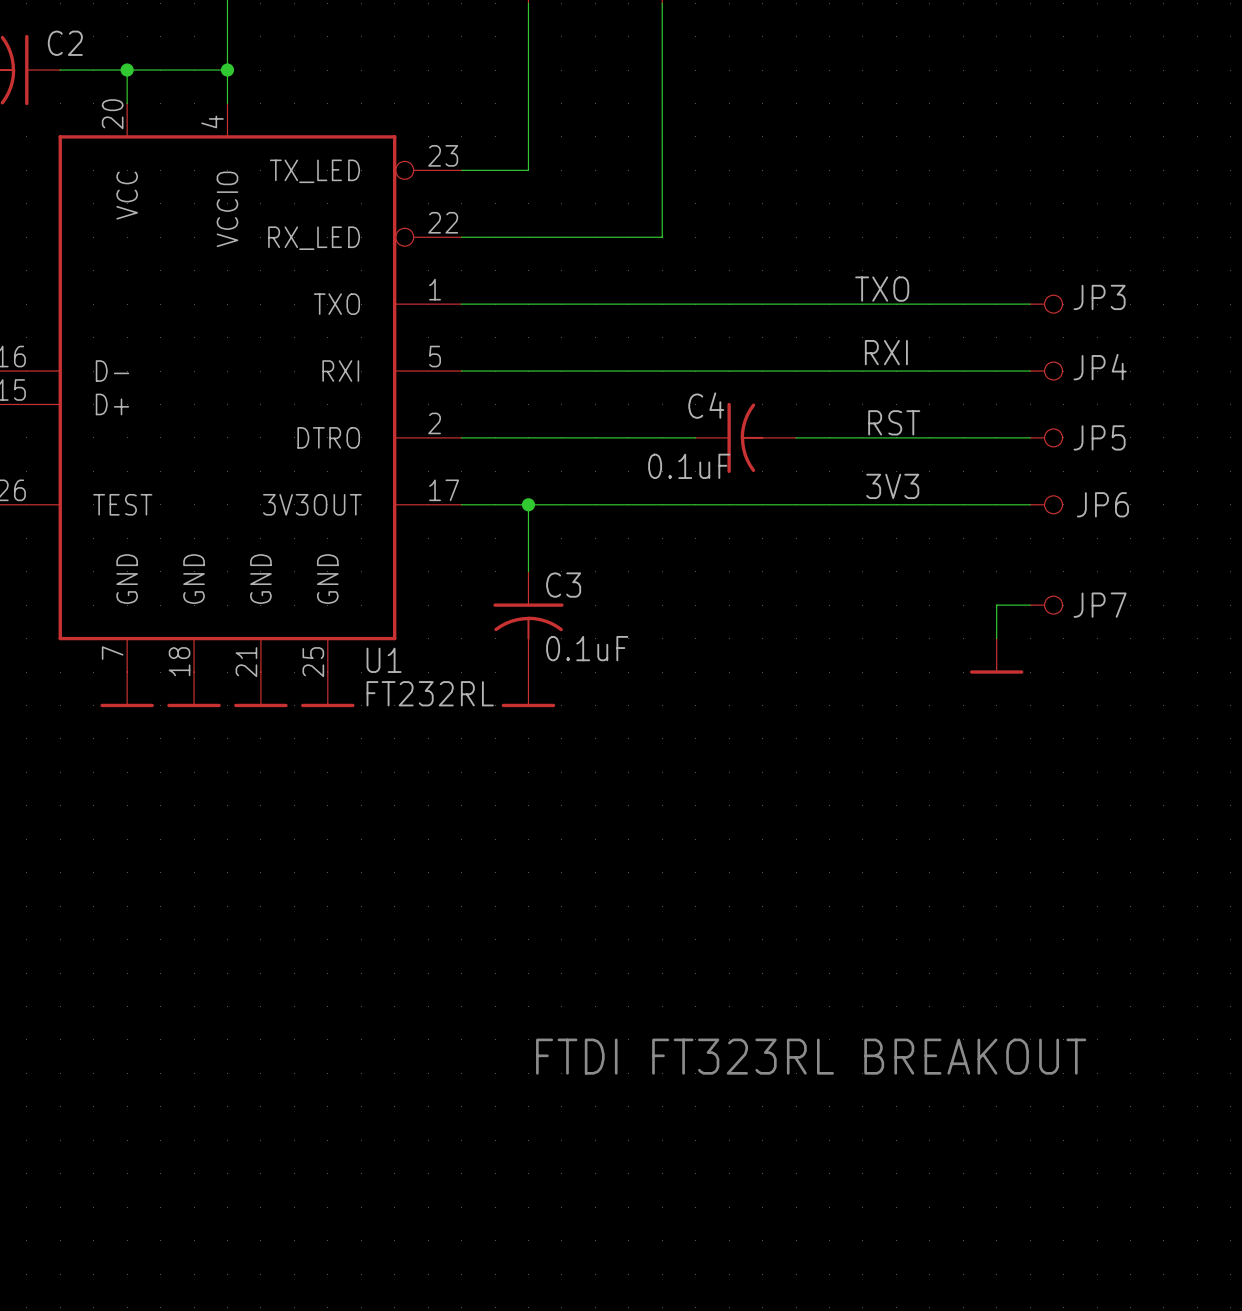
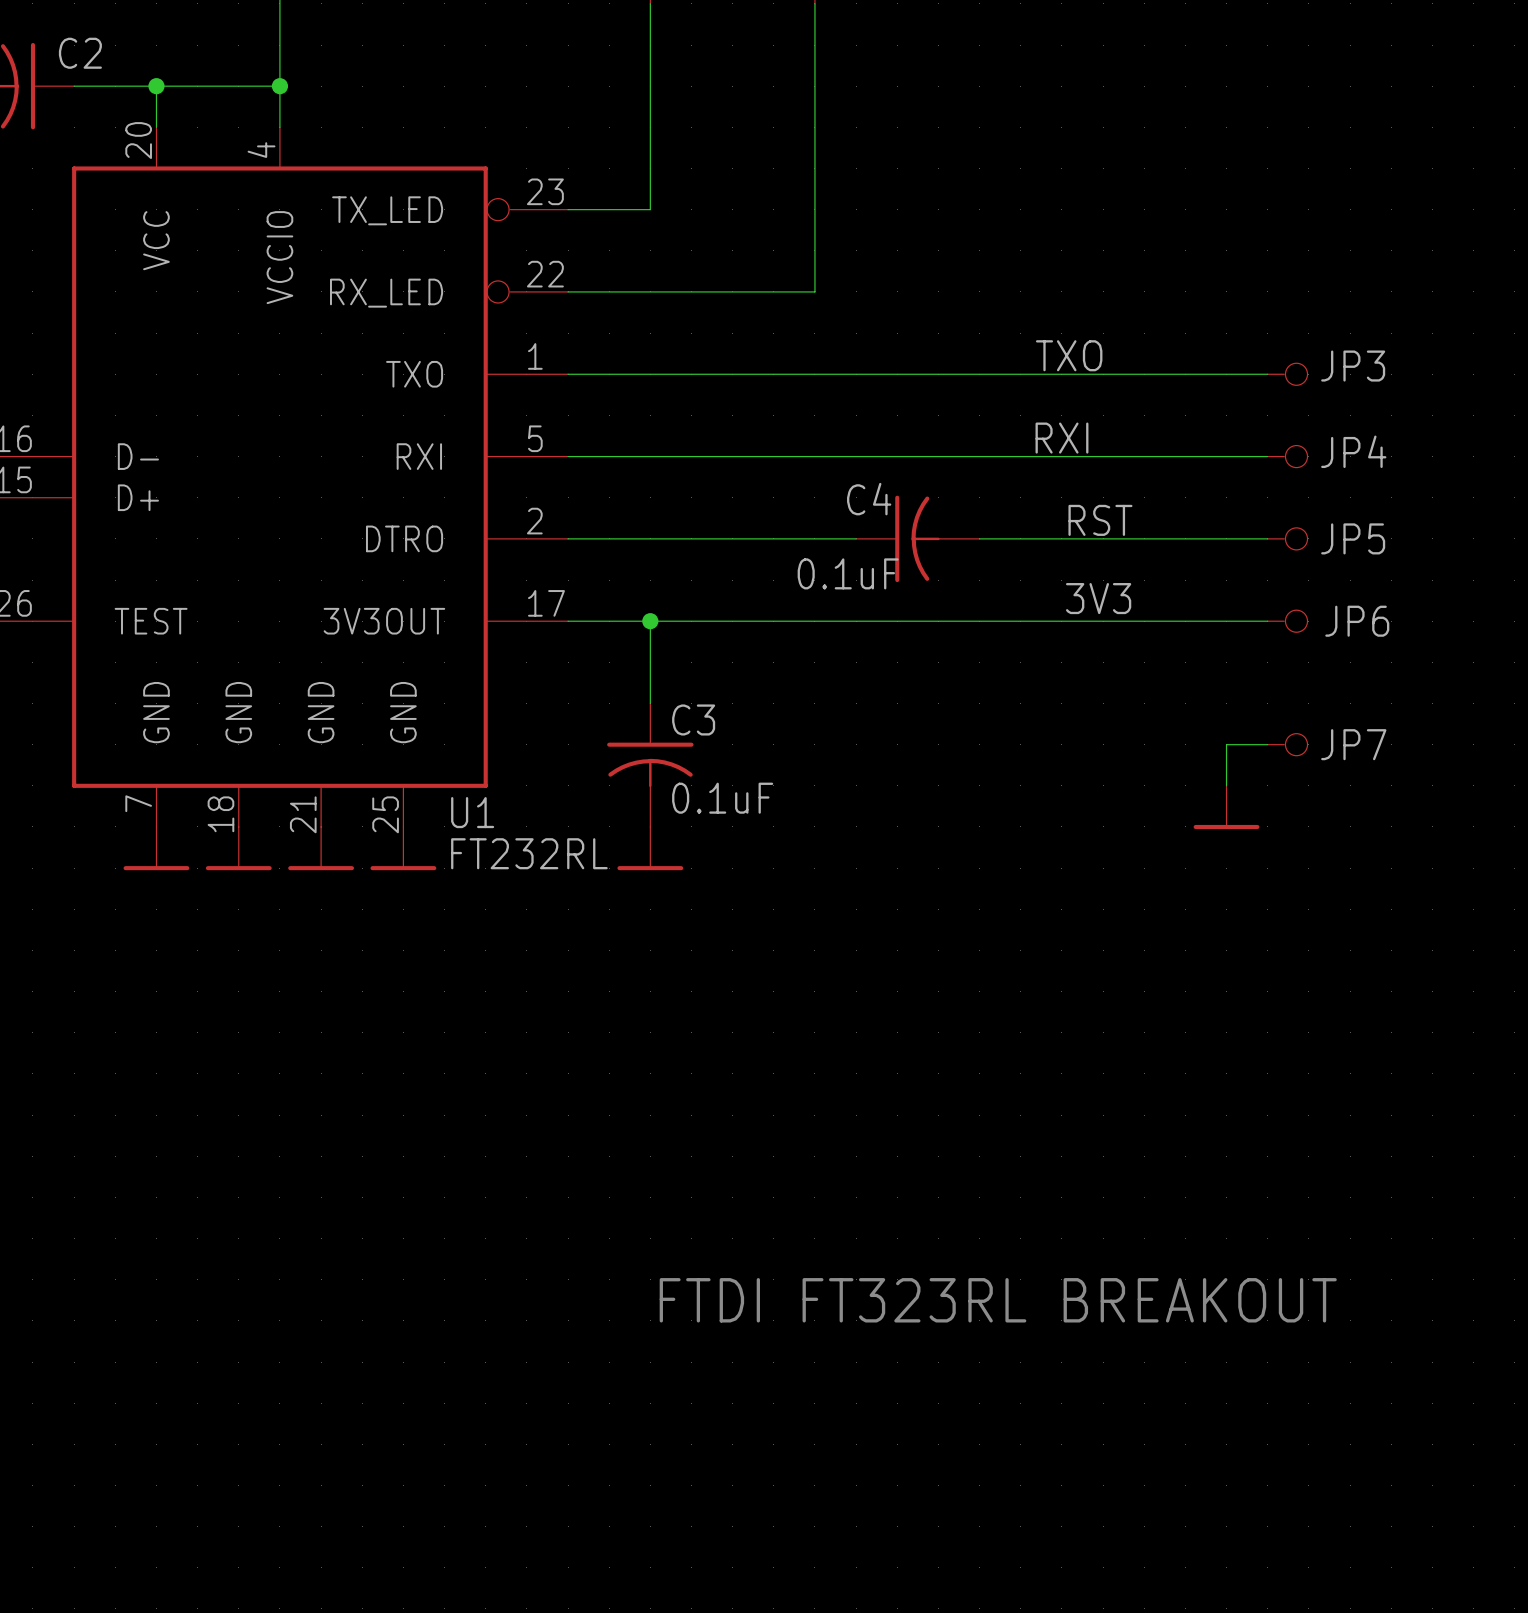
label position: TXO (882, 289) -> TXO (1069, 355)
label position: RXI (886, 352) -> RXI (1061, 438)

